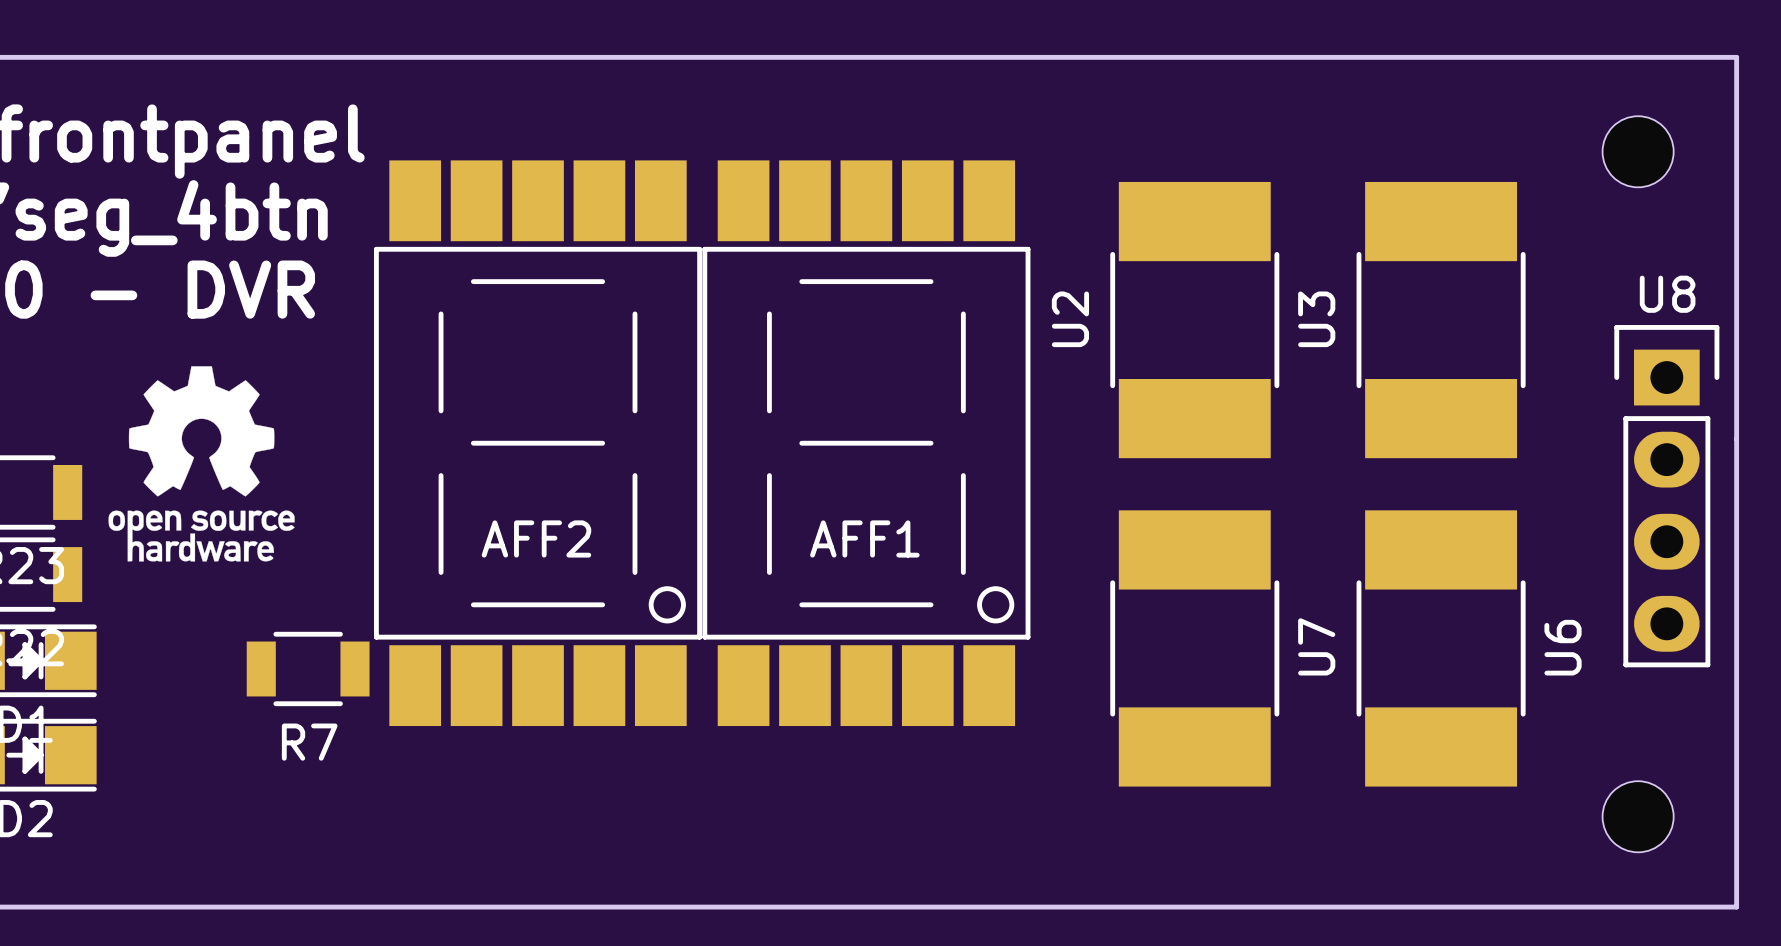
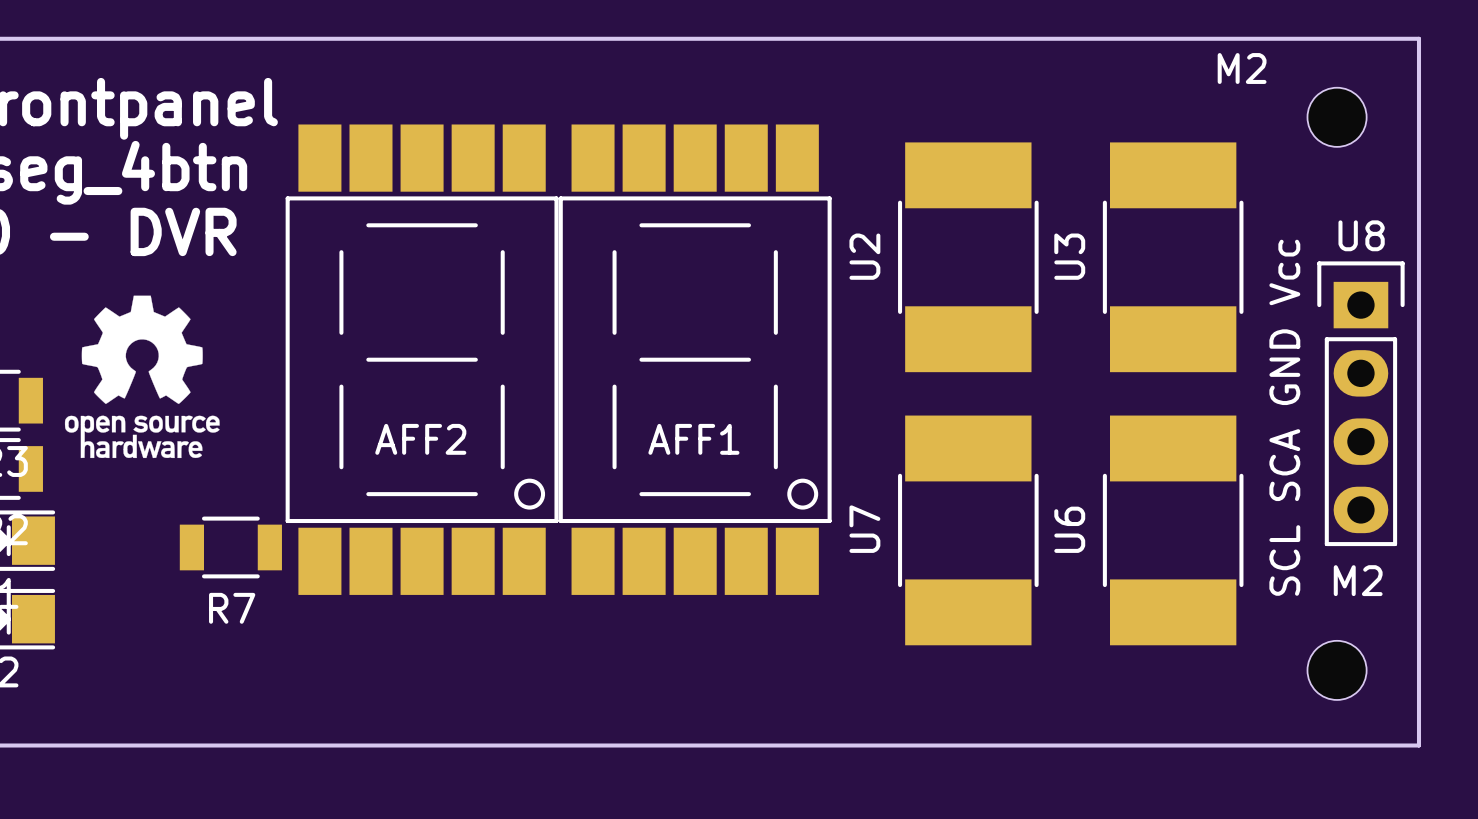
part value: none -> M2 (1242, 68)
U8 value: none -> SCL SCA GND Vcc (1284, 417)
U7 name position: U7 (1316, 646) -> U7 (864, 529)
U6 name position: U6 (1563, 647) -> U6 (1069, 529)
part value: none -> M2 (1358, 580)

